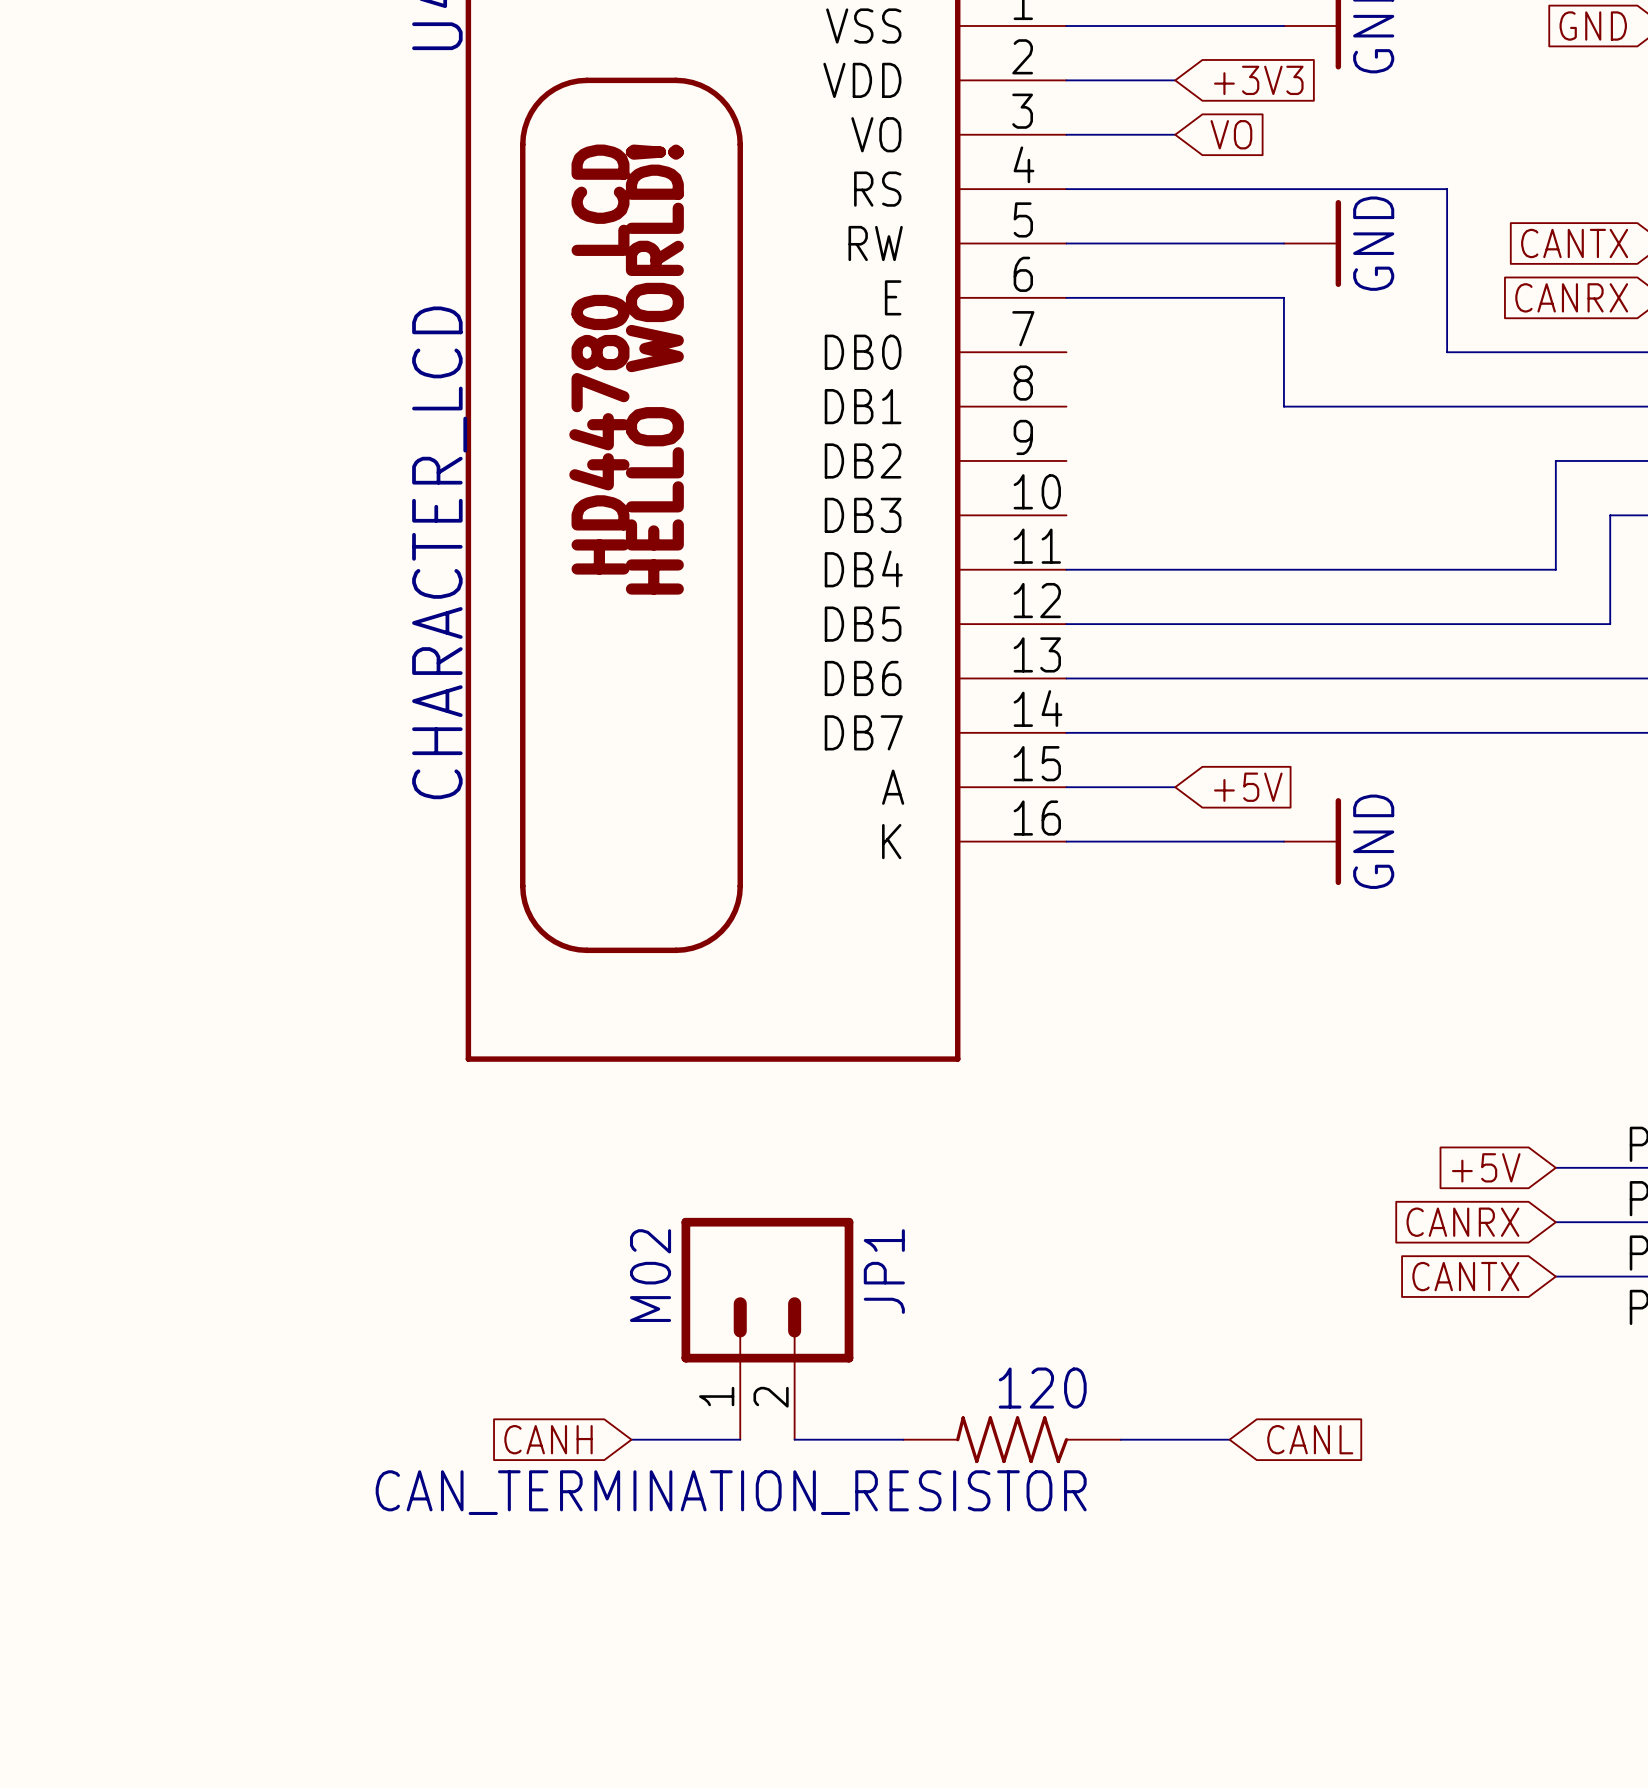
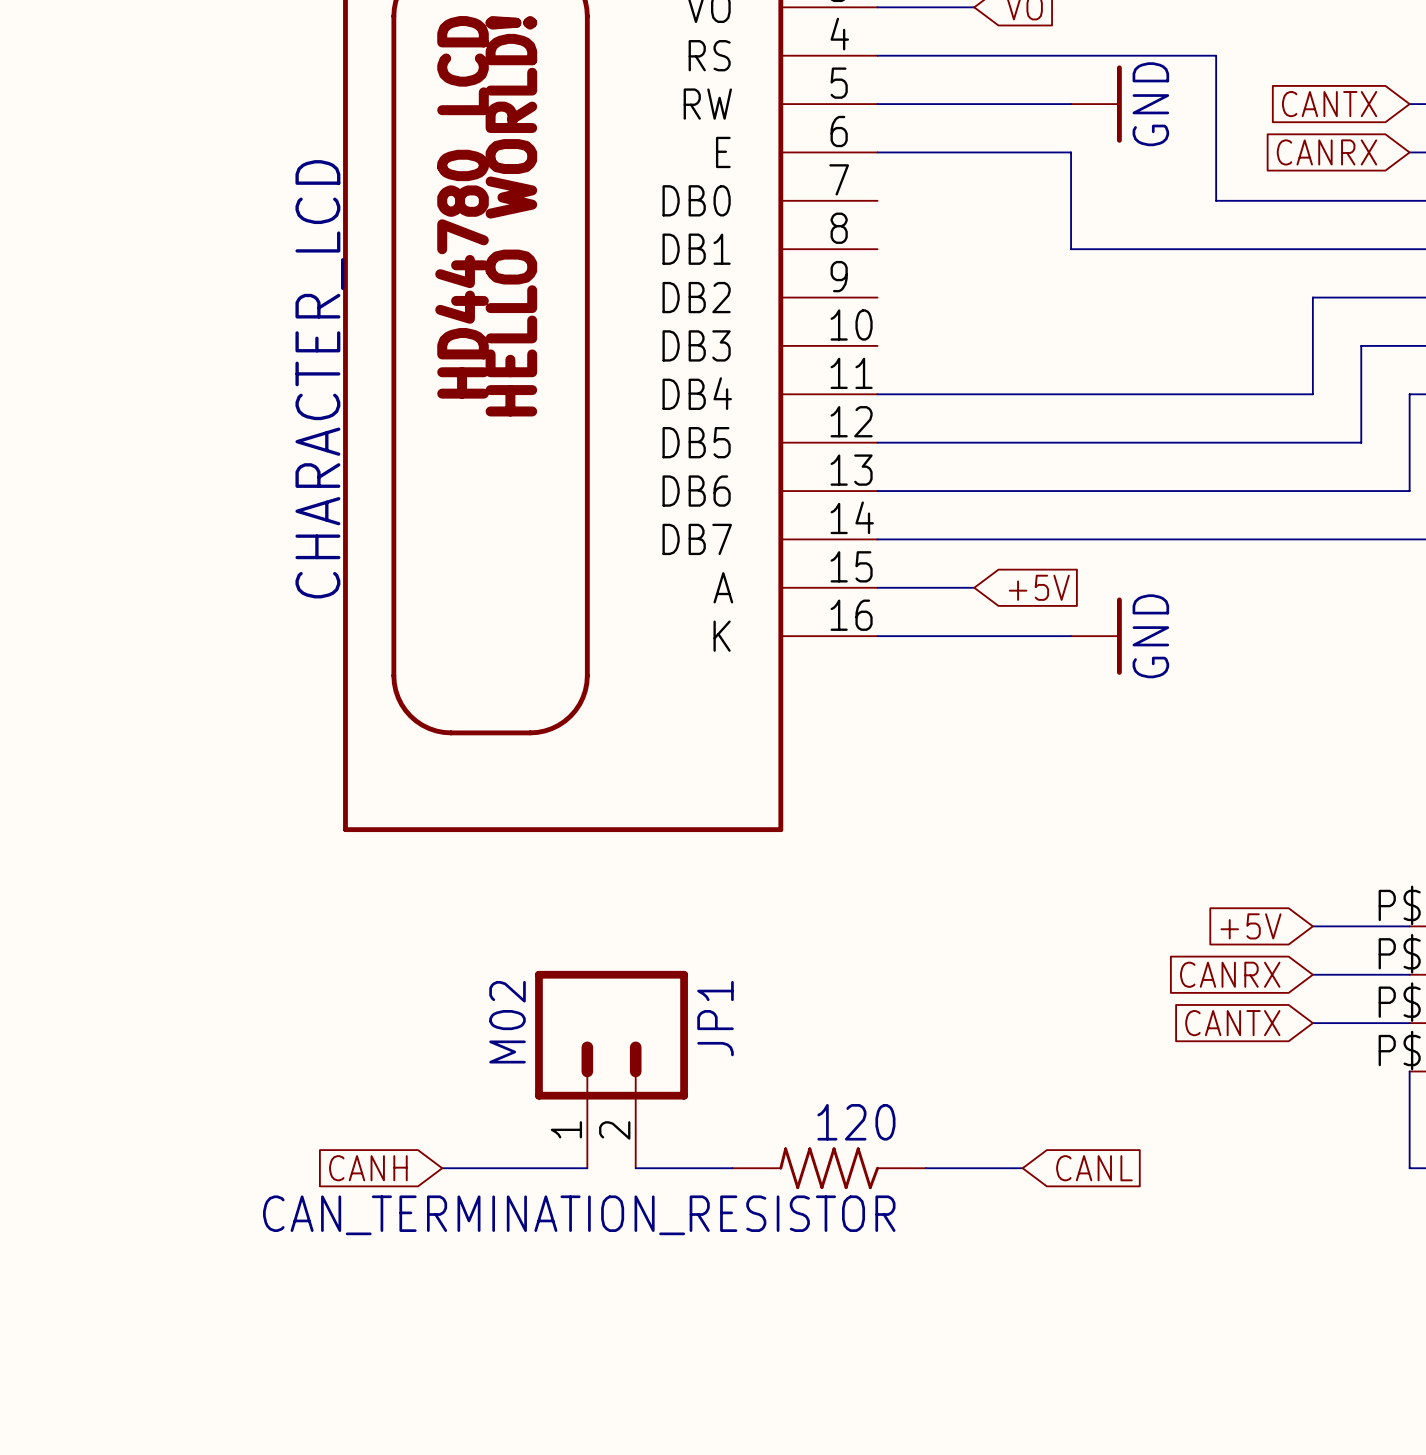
global label position: CANH (548, 1439) -> CANH (368, 1168)
wire: none -> (442, 1168) (490, 1168)

